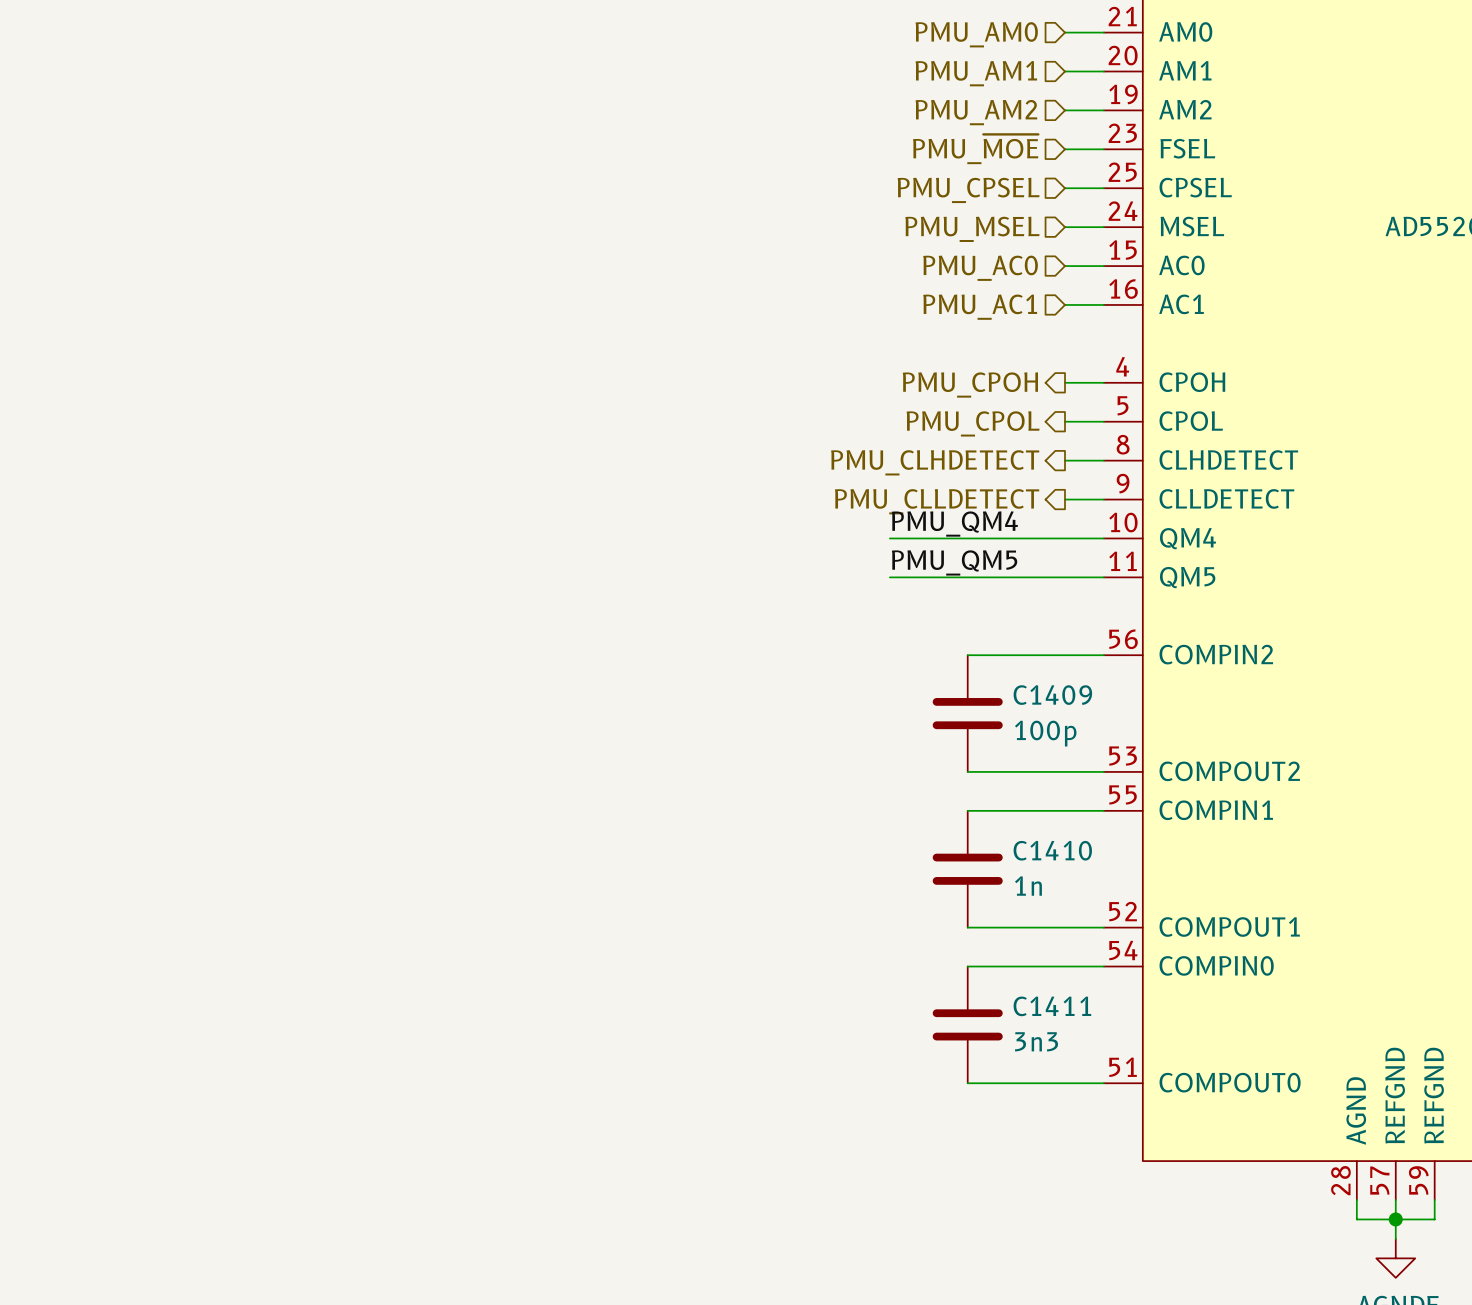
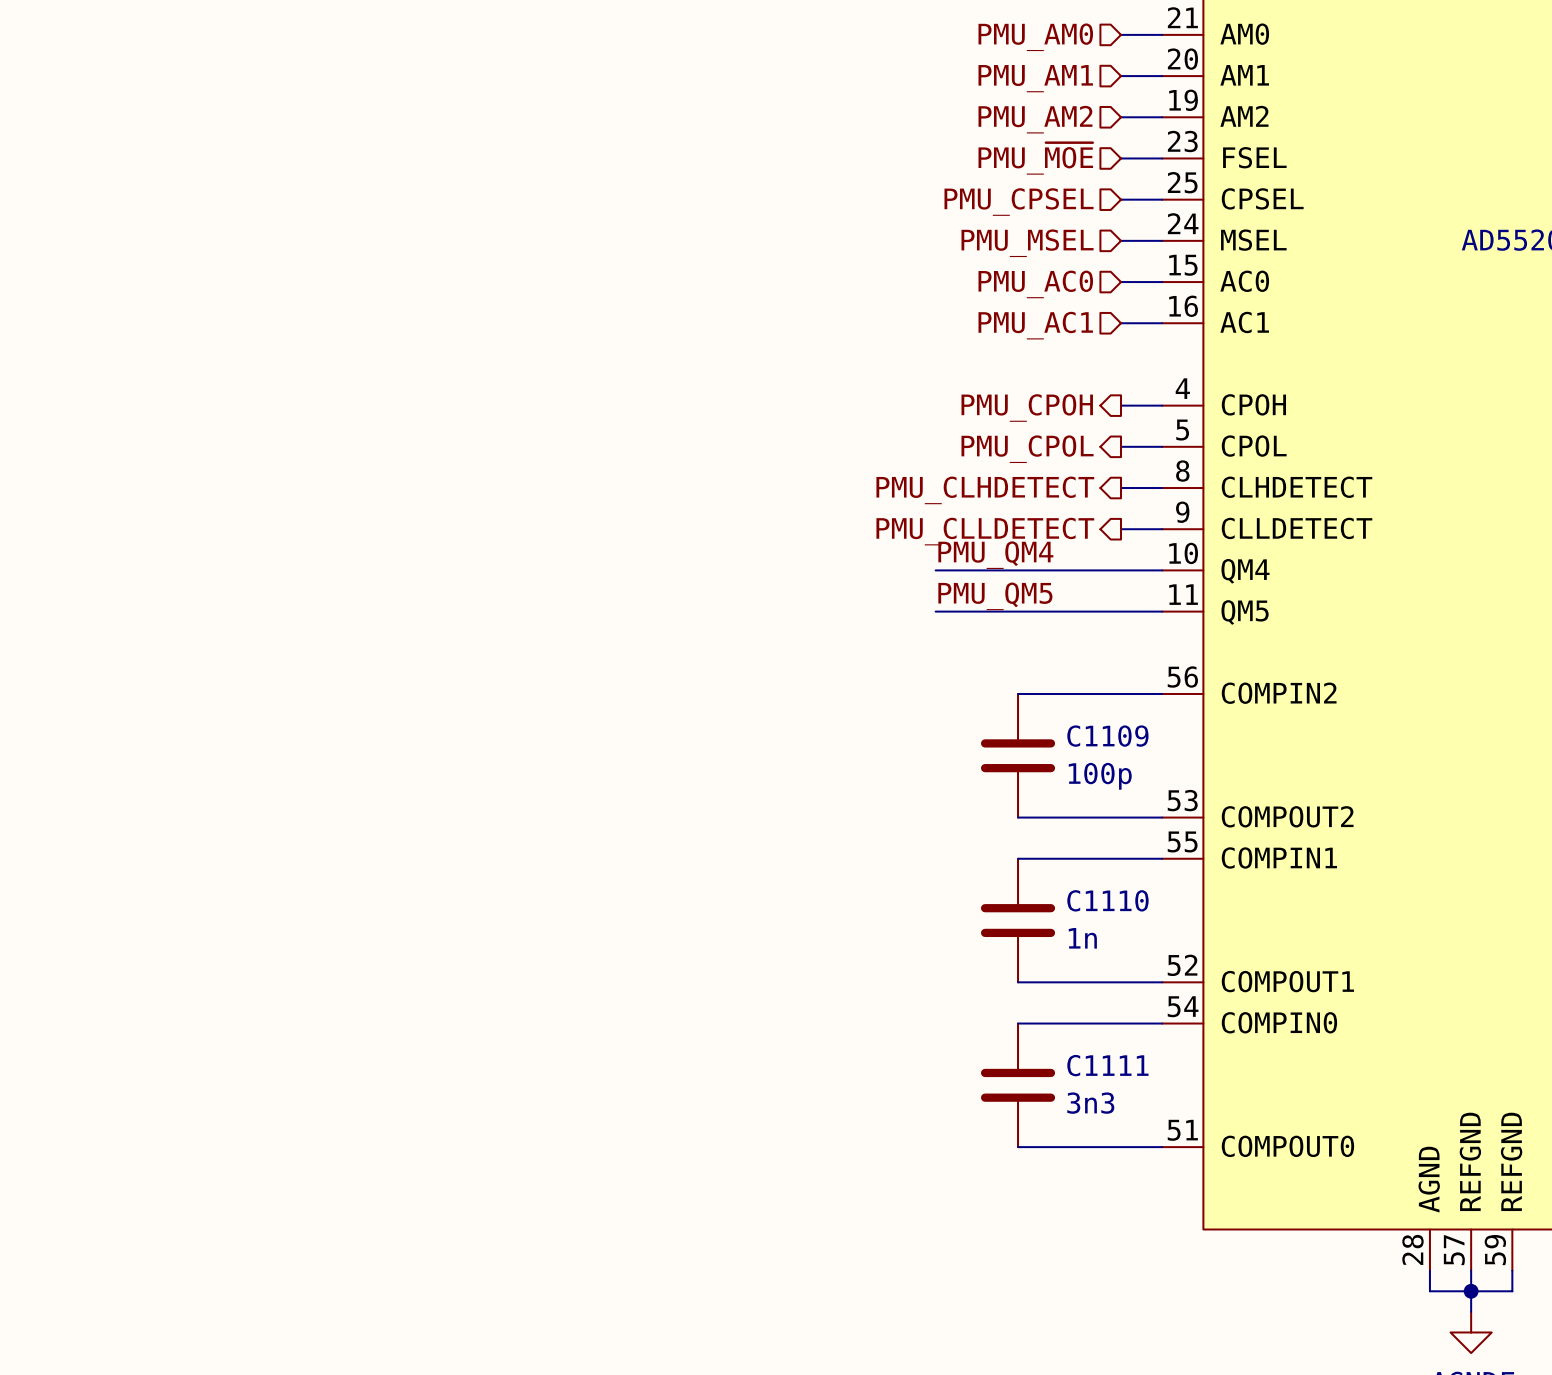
C1409 name: C1409 (1052, 695) -> C1109 (1107, 736)
C1410 name: C1410 (1052, 850) -> C1110 (1107, 900)
C1411 name: C1411 (1052, 1006) -> C1111 (1107, 1065)

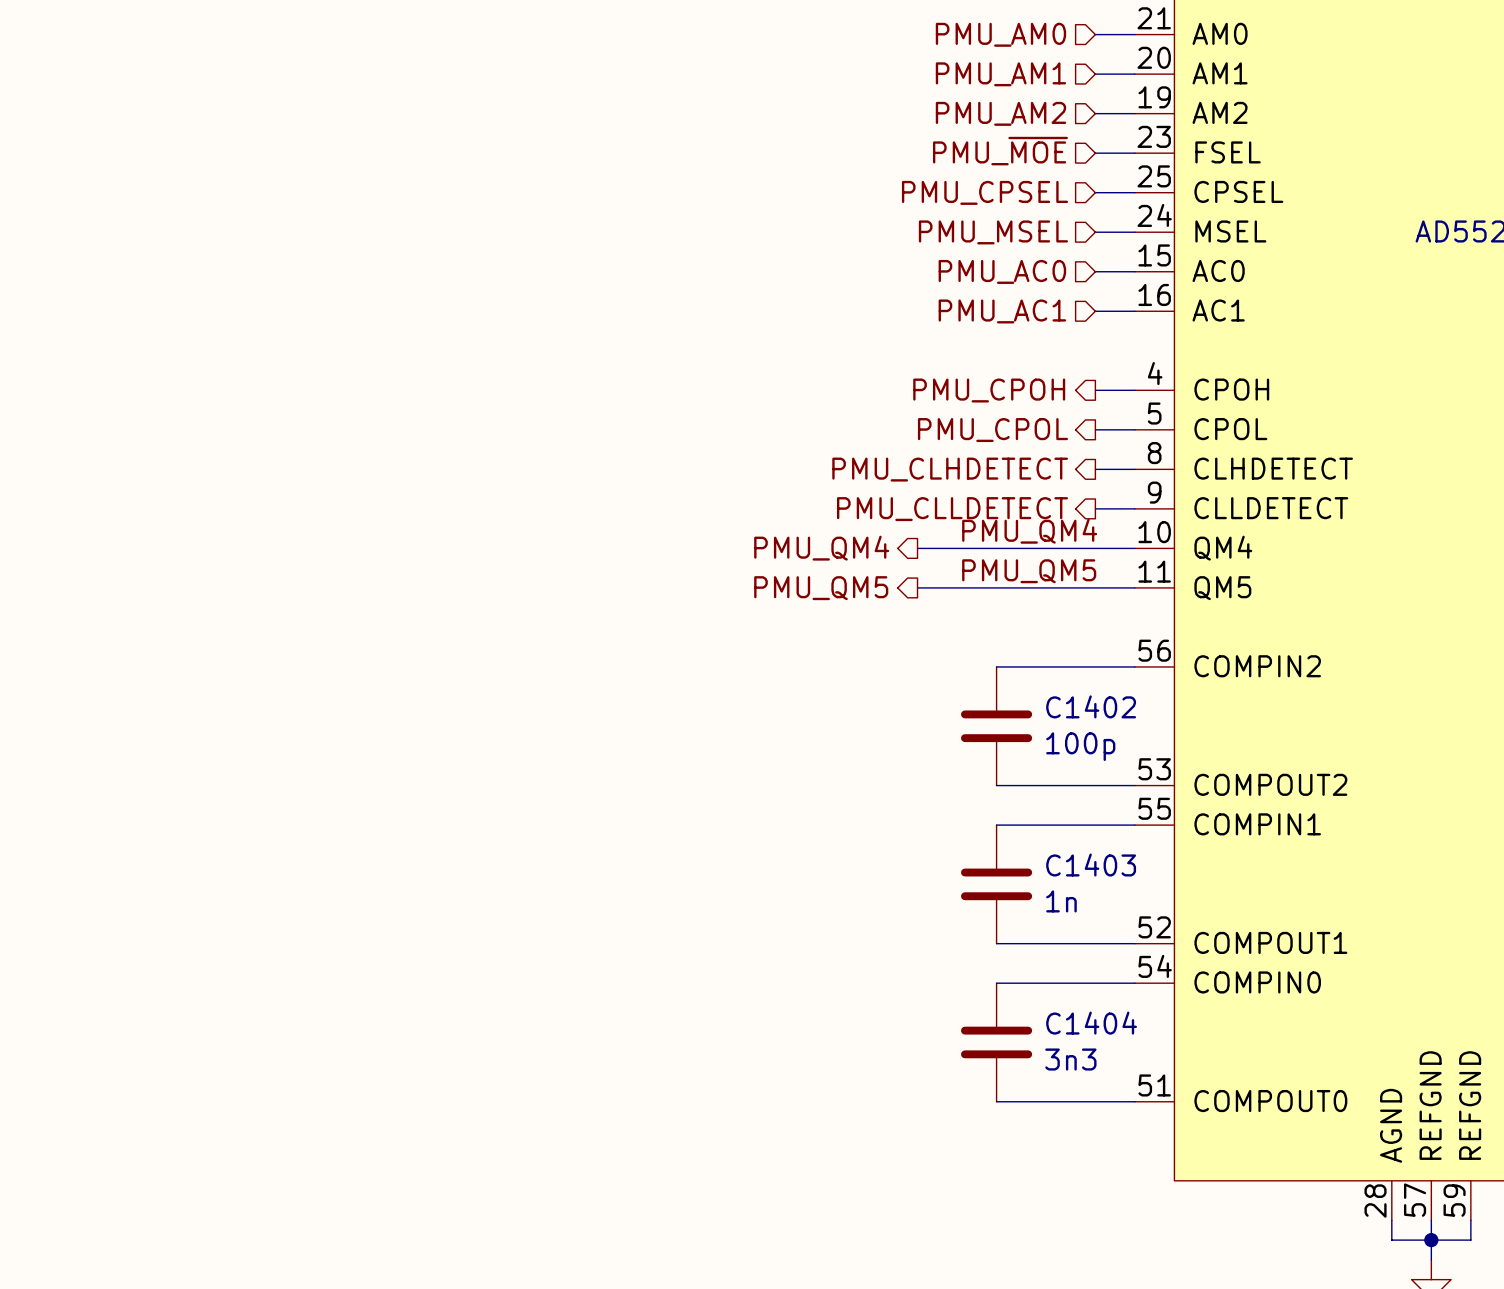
label position: PMU_QM4 (995, 555) -> PMU_QM4 (1029, 531)
hierarchical label: none -> PMU_QM4 (821, 548)
label position: PMU_QM5 (995, 596) -> PMU_QM5 (1029, 571)
hierarchical label: none -> PMU_QM5 (821, 588)
C1109 name: C1109 (1107, 736) -> C1402 (1091, 706)
C1110 name: C1110 (1107, 900) -> C1403 (1091, 864)
C1111 name: C1111 (1107, 1065) -> C1404 (1091, 1023)

